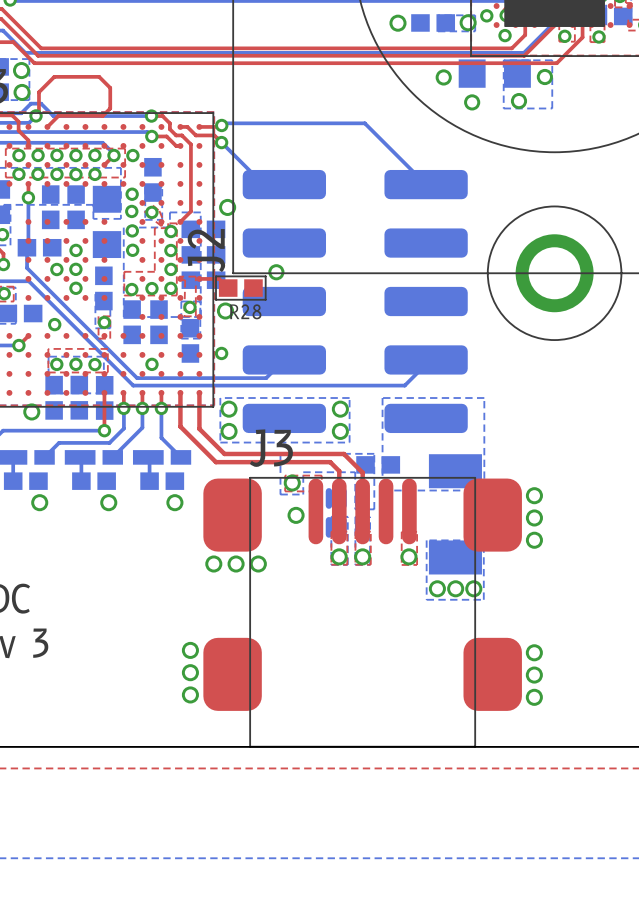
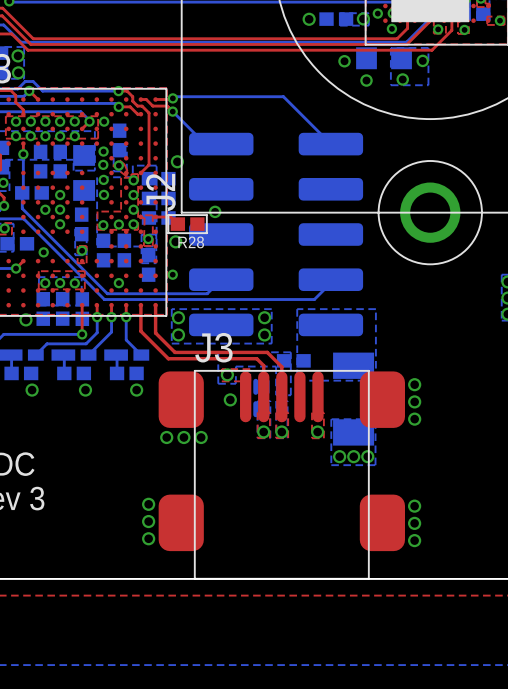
top track: (36, 115) (38, 112) (38, 92) (54, 76) (99, 76) (110, 87) (110, 108) (102, 115) (58, 115) (47, 126) -> (29, 90) (38, 99)

